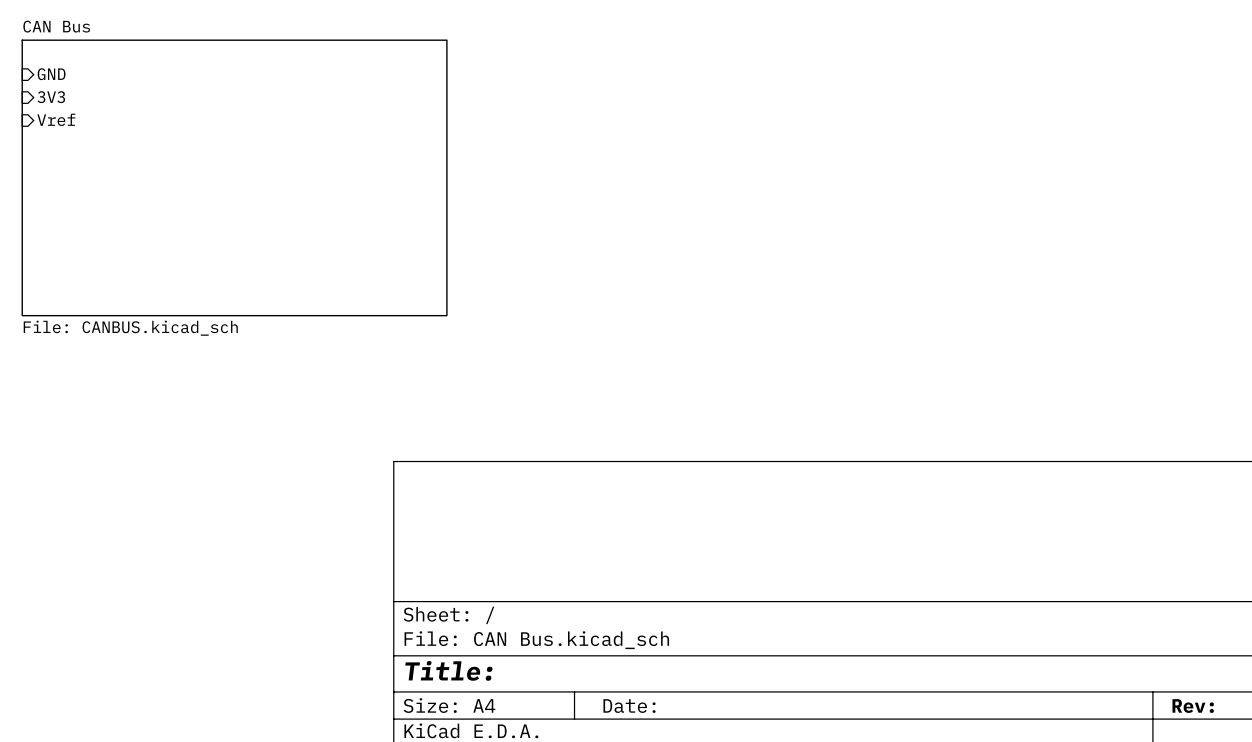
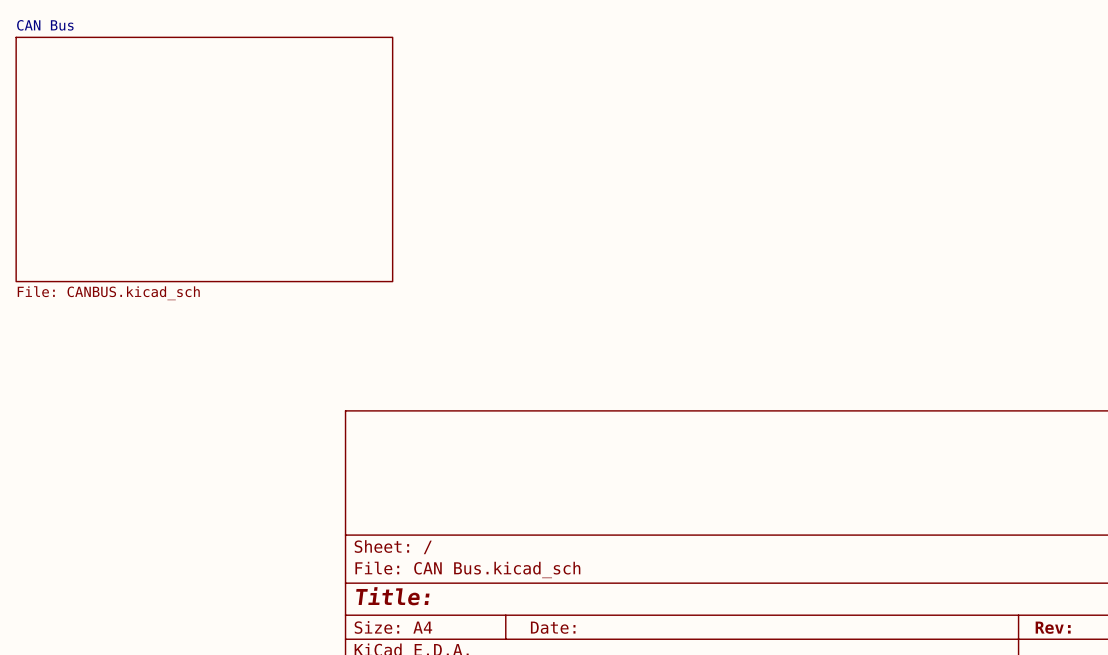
sheet pin: GND (51, 74) -> none
sheet pin: 3V3 (51, 97) -> none
sheet pin: Vref (56, 119) -> none

